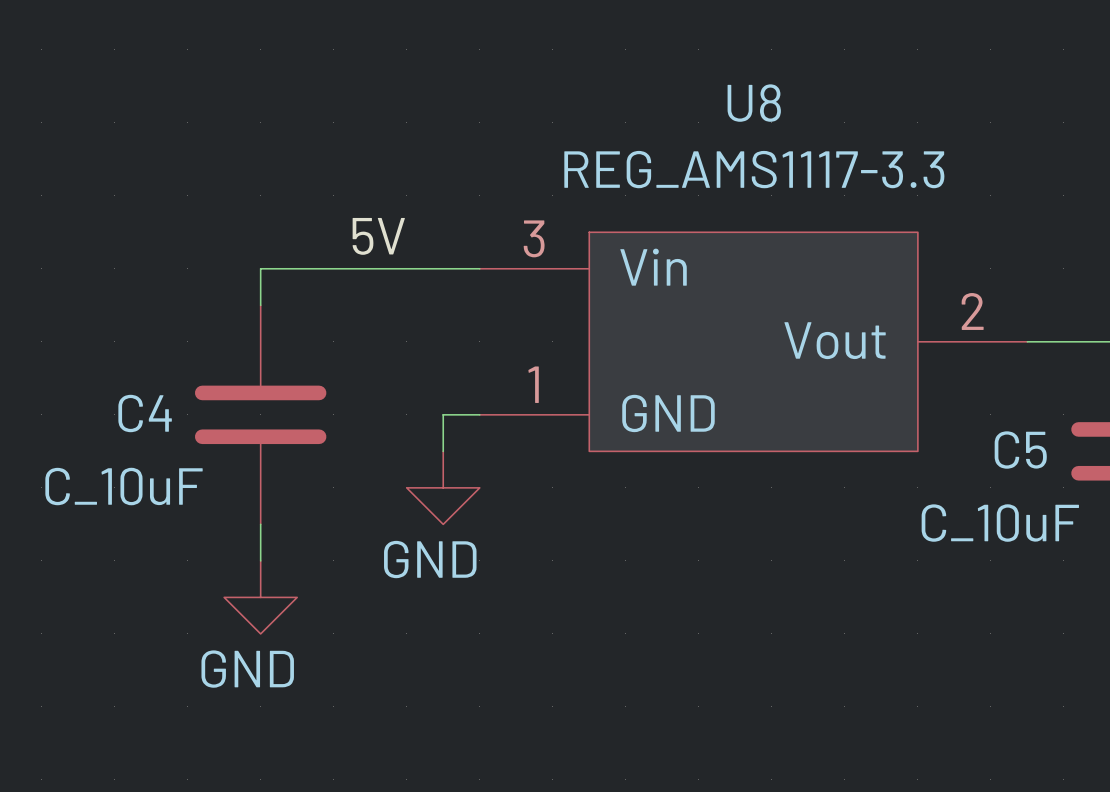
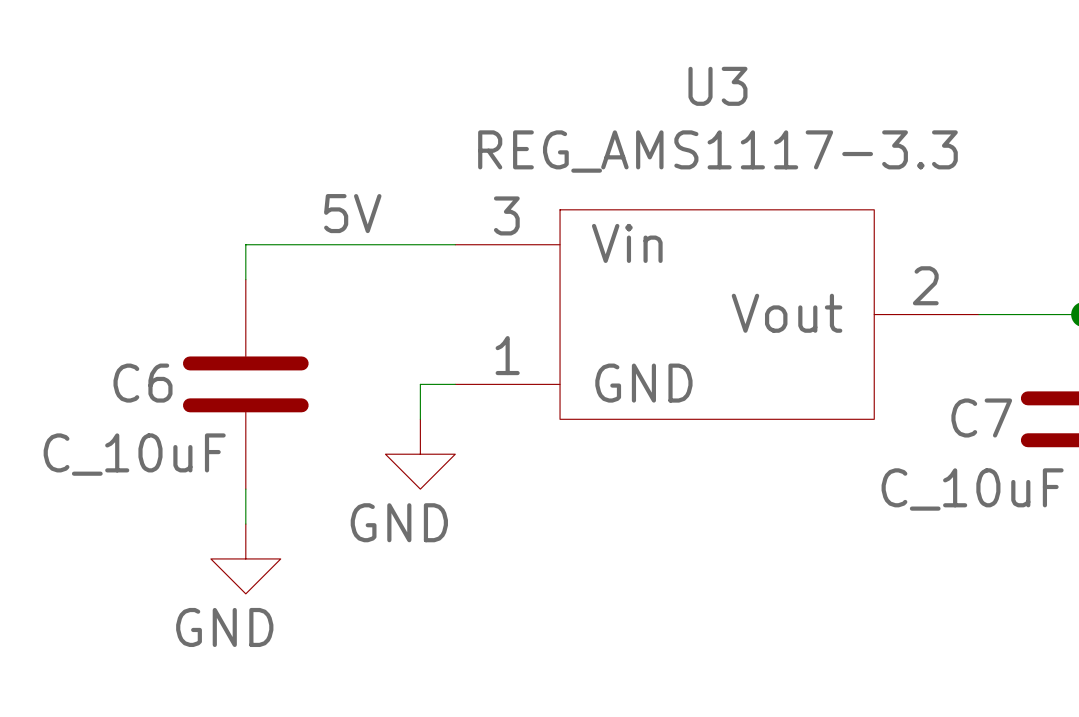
U8 name: U8 (754, 103) -> U3 (717, 86)
C4 name: C4 (145, 413) -> C6 (143, 383)
C5 name: C5 (1020, 450) -> C7 (981, 417)

